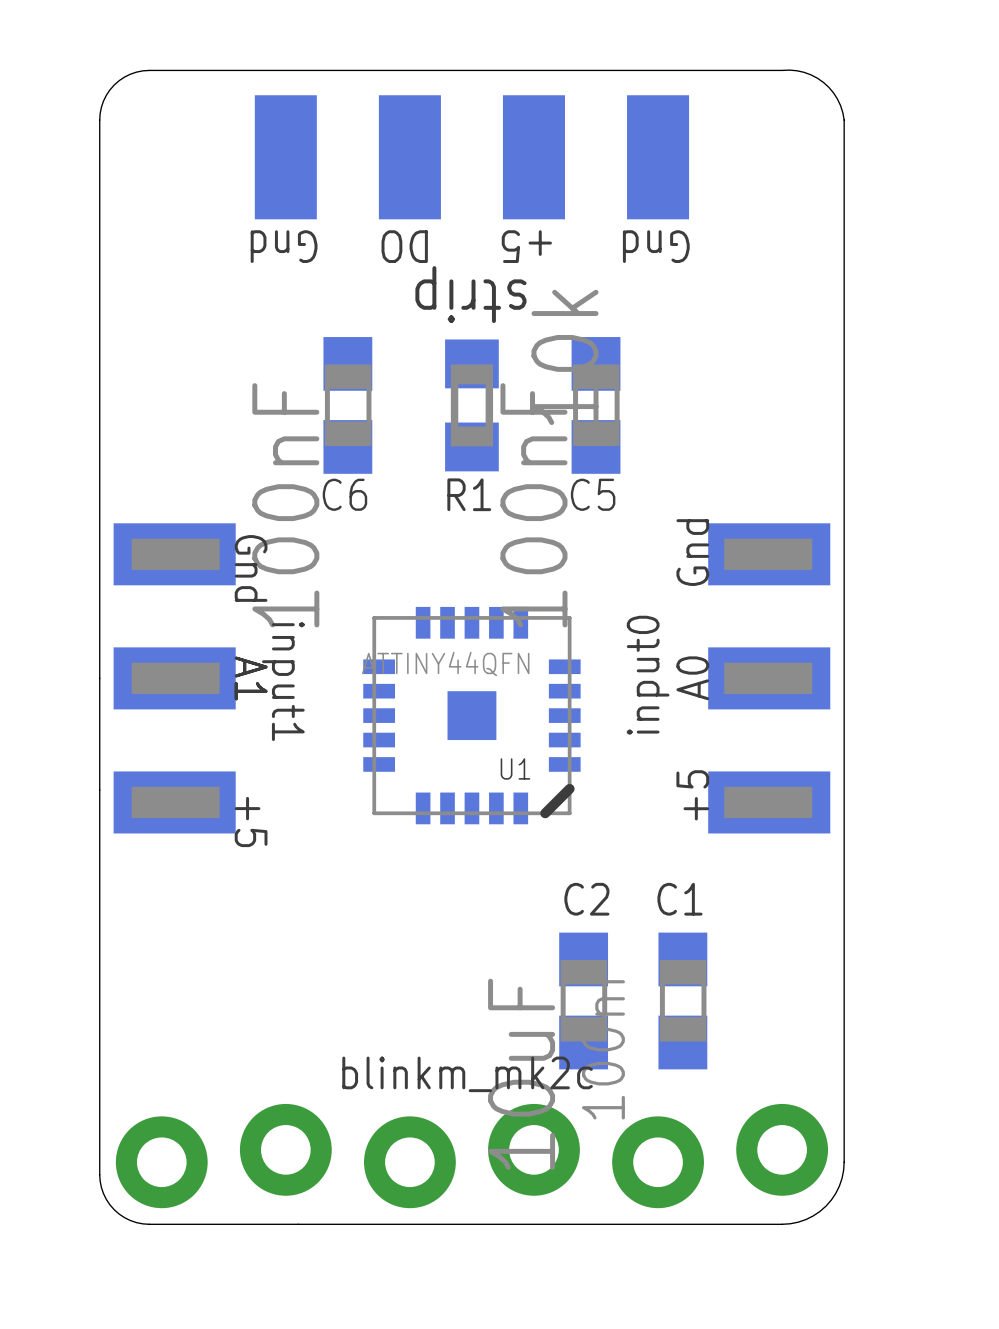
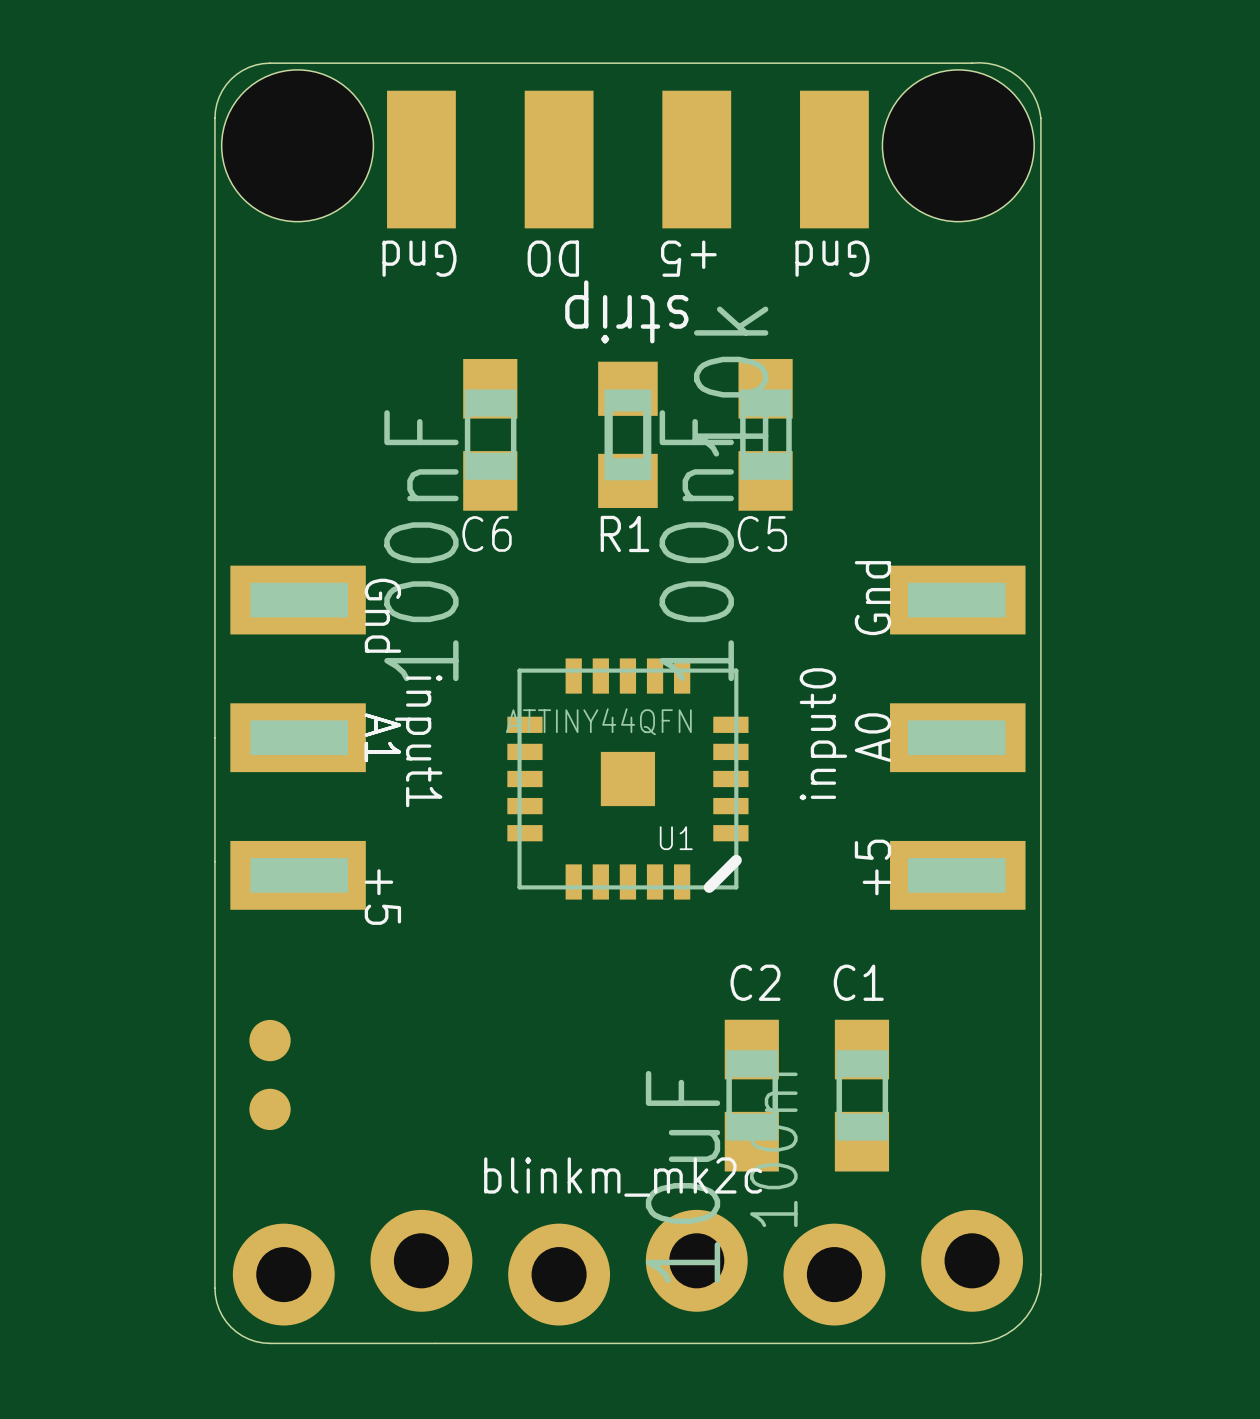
hole: none -> (297, 145)
hole: none -> (958, 145)
part: none -> (270, 1040)
part: none -> (270, 1109)

